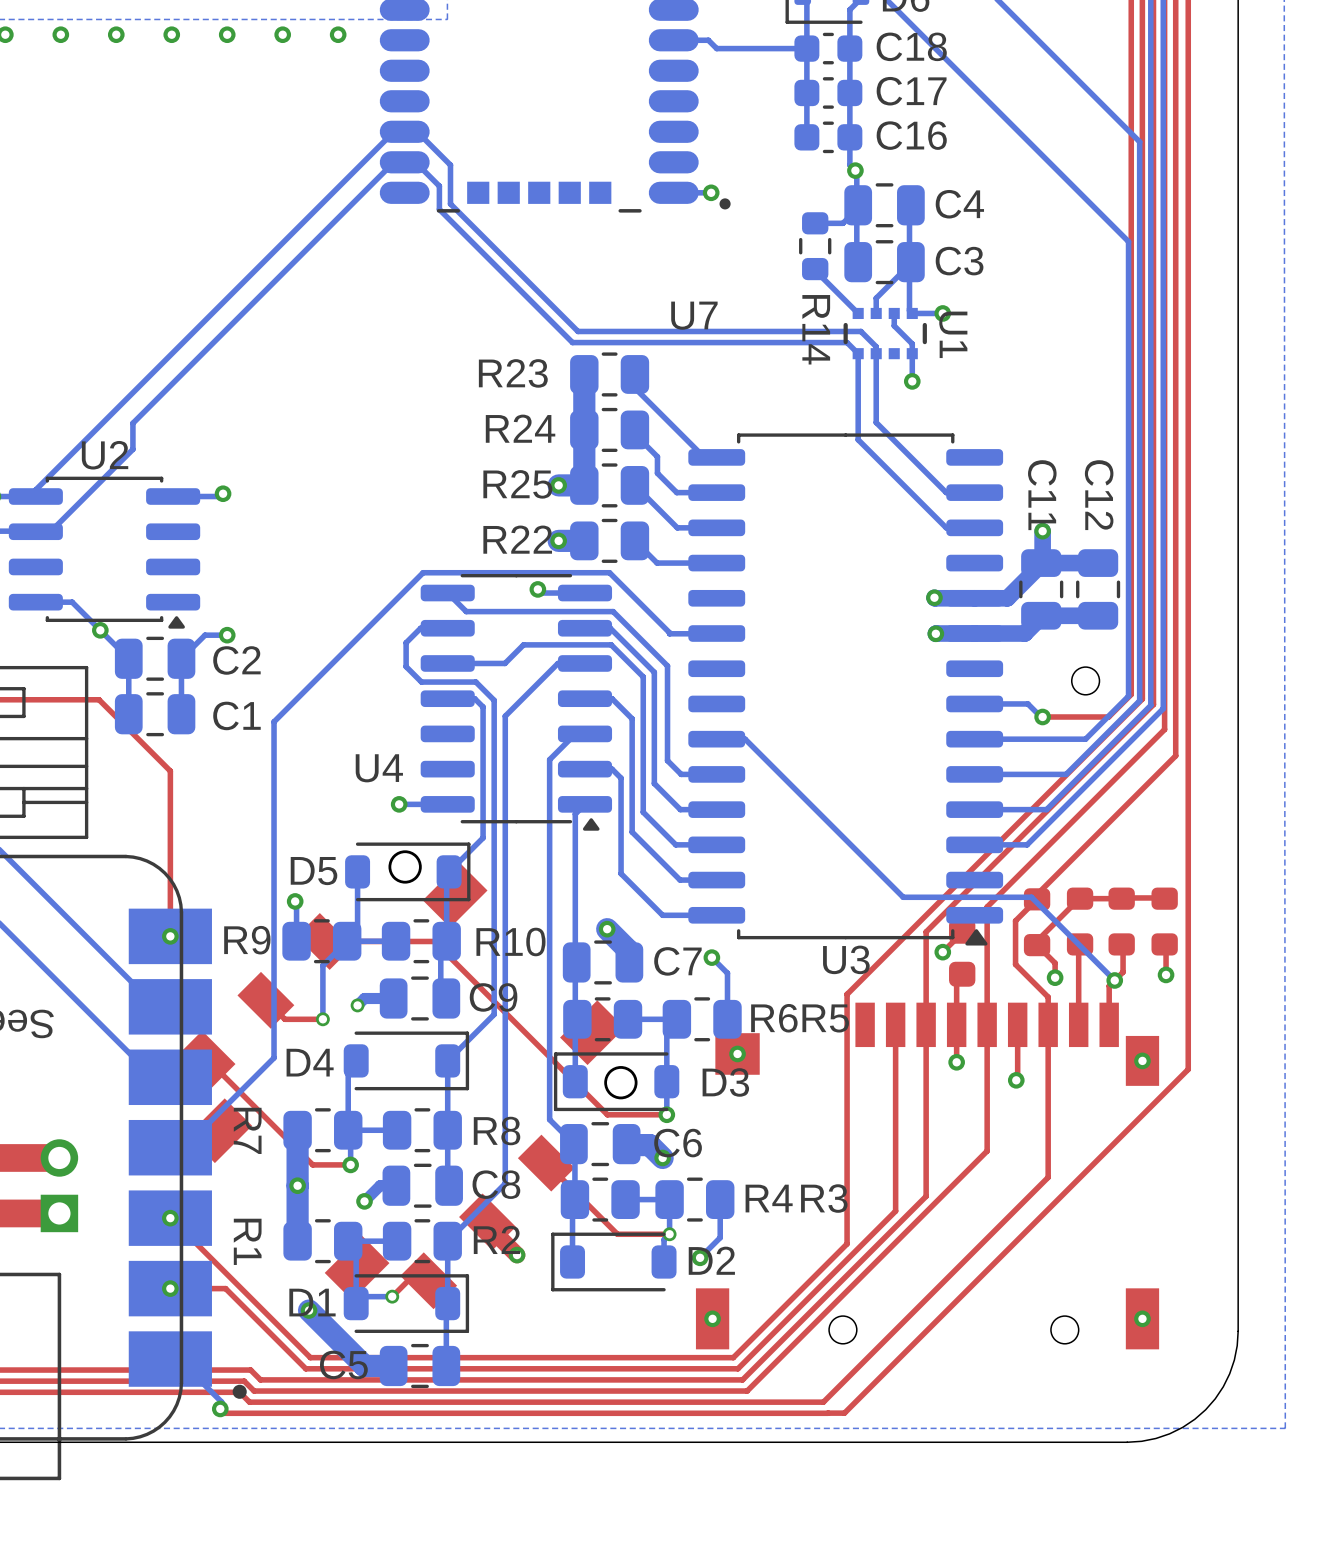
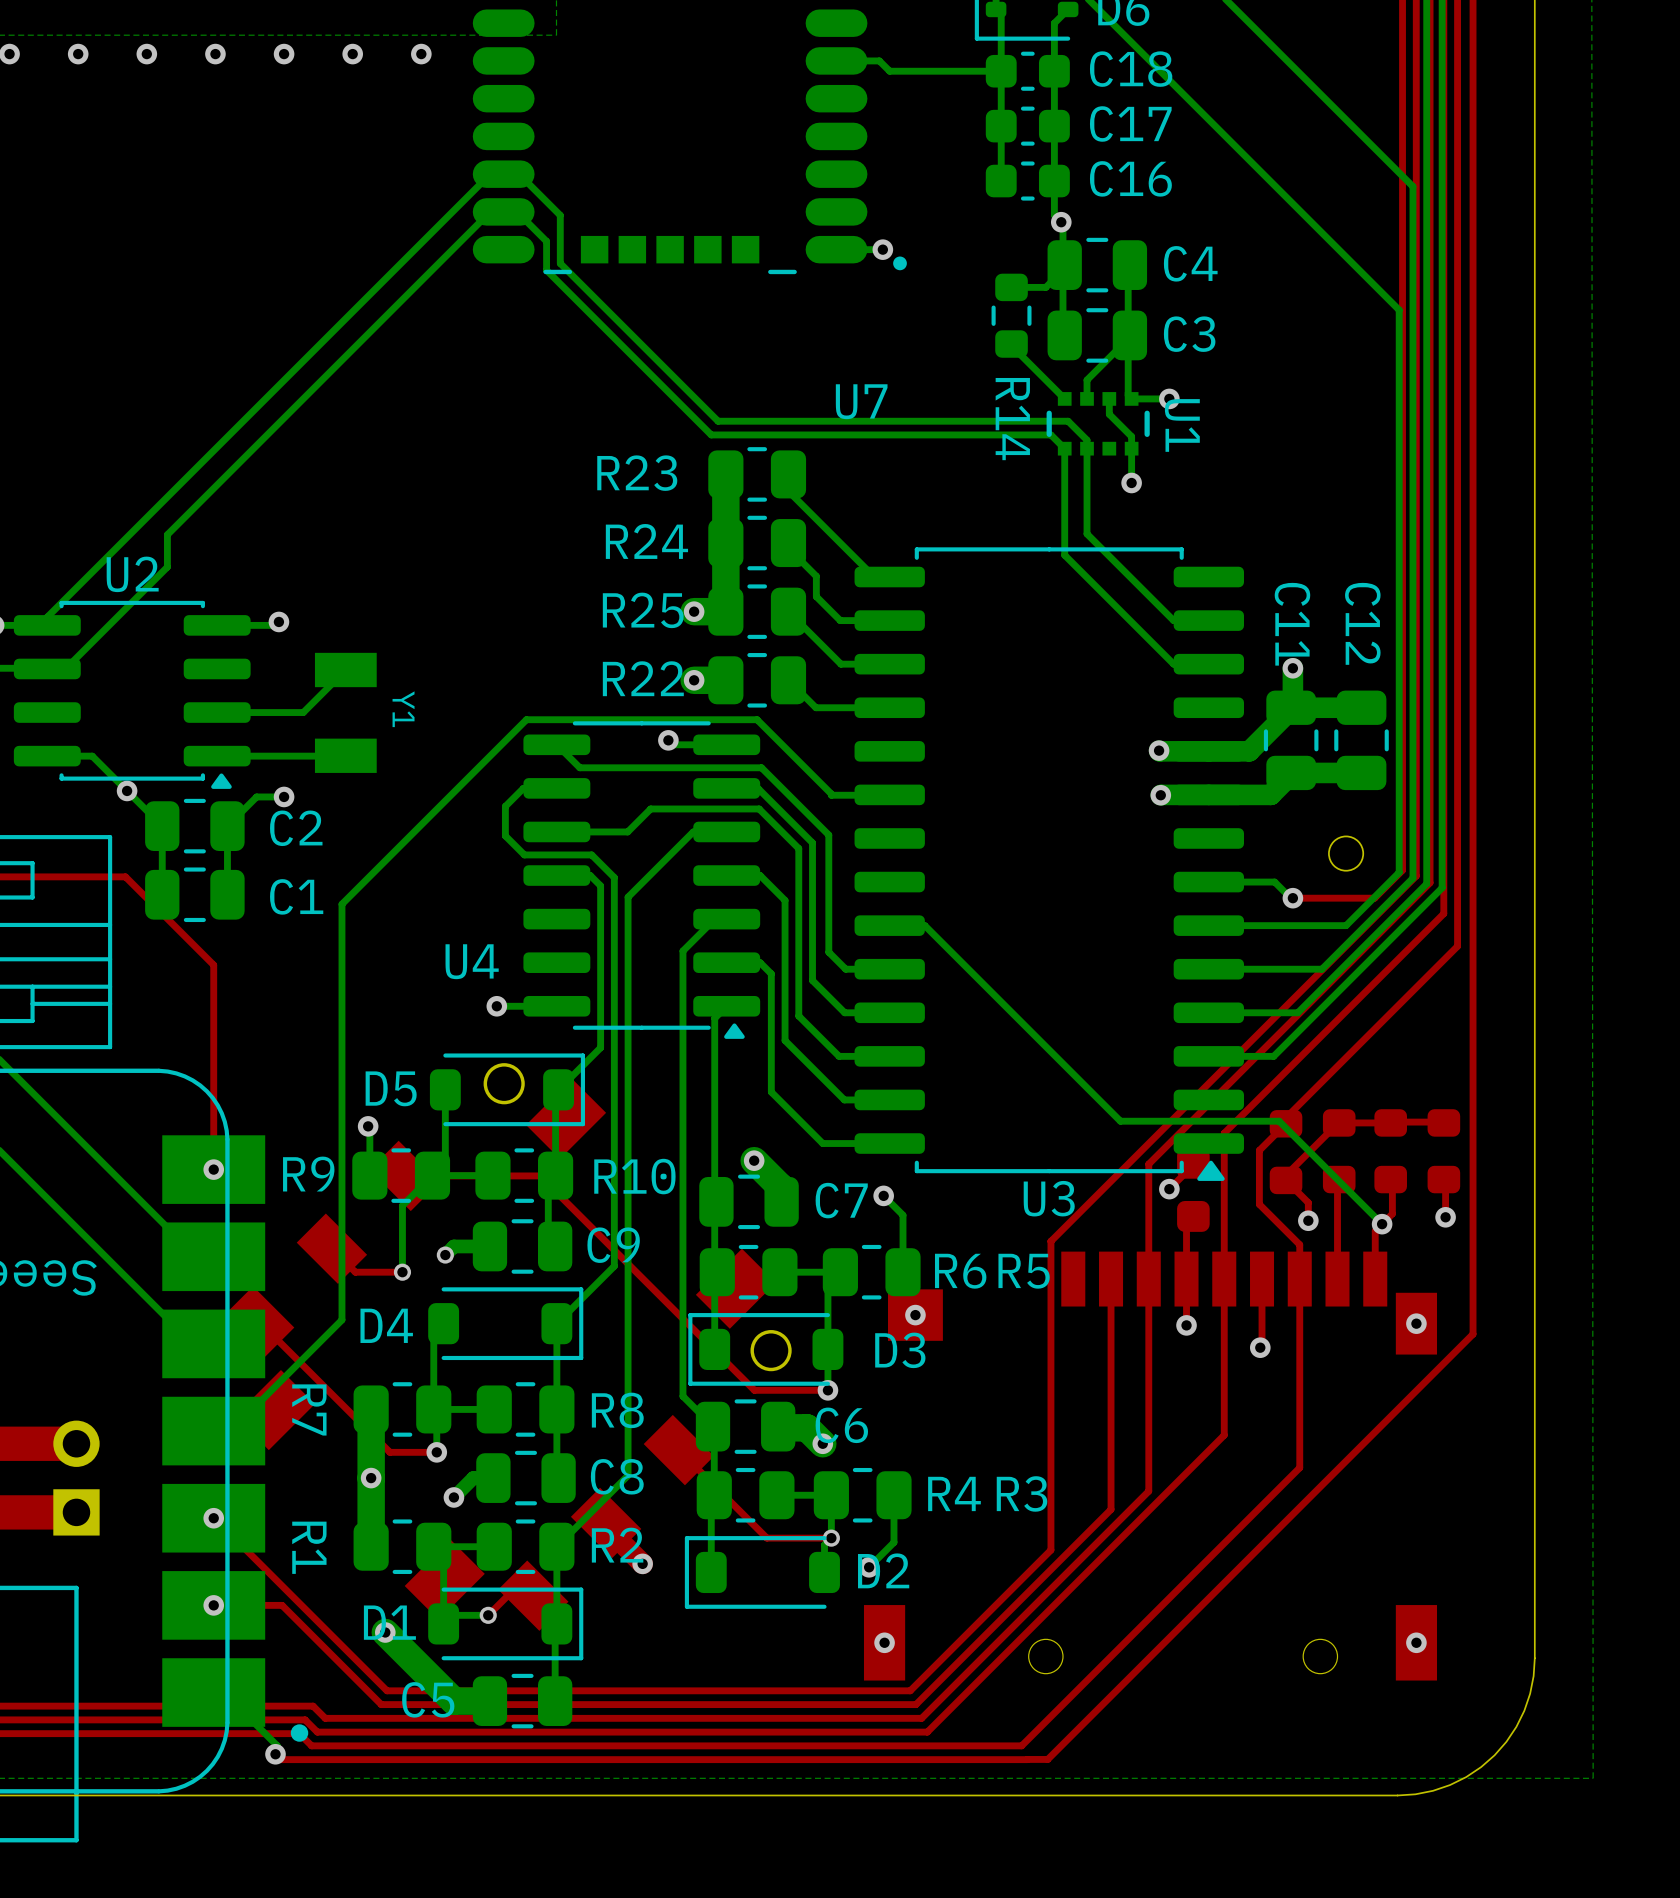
bottom track: none -> (345, 670) (303, 712) (217, 712)
Y1: none -> (345, 712)
bottom track: none -> (345, 756) (217, 756)

